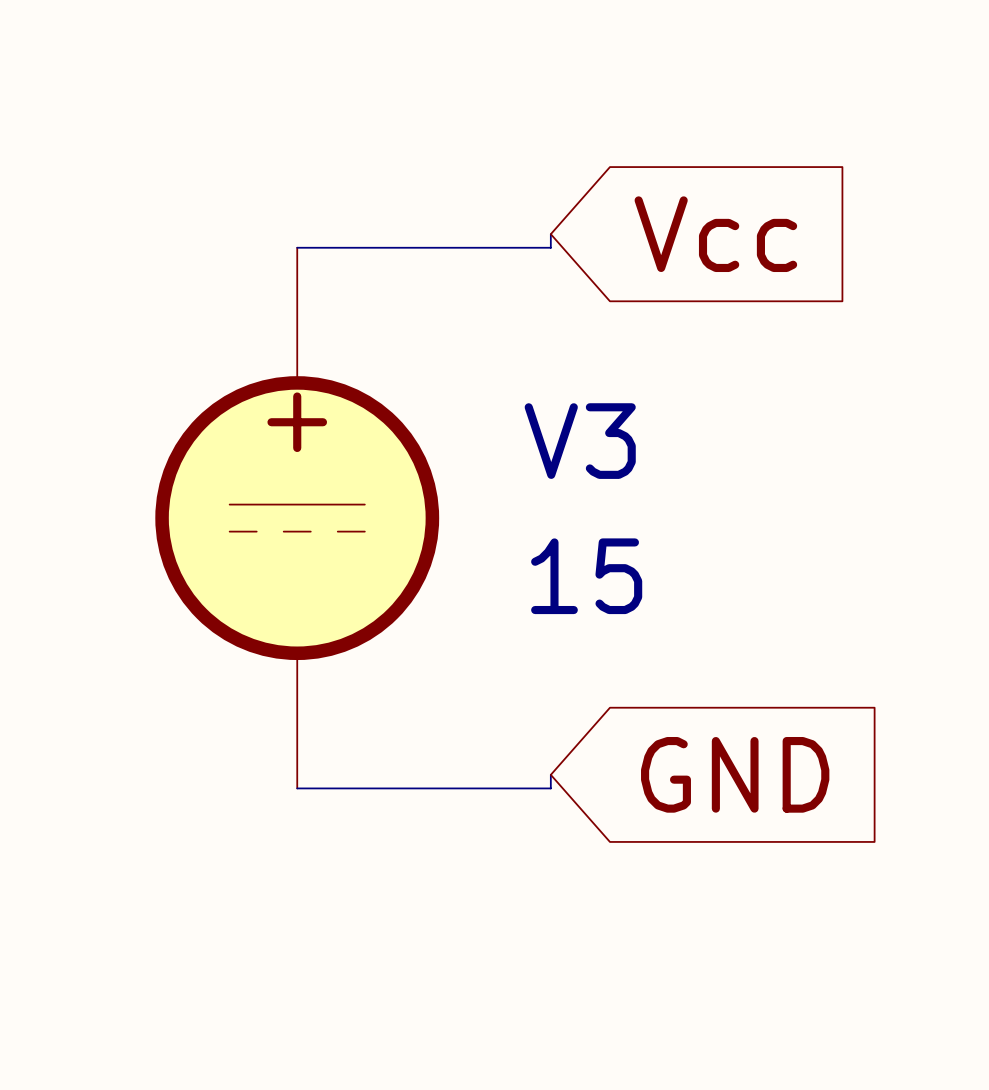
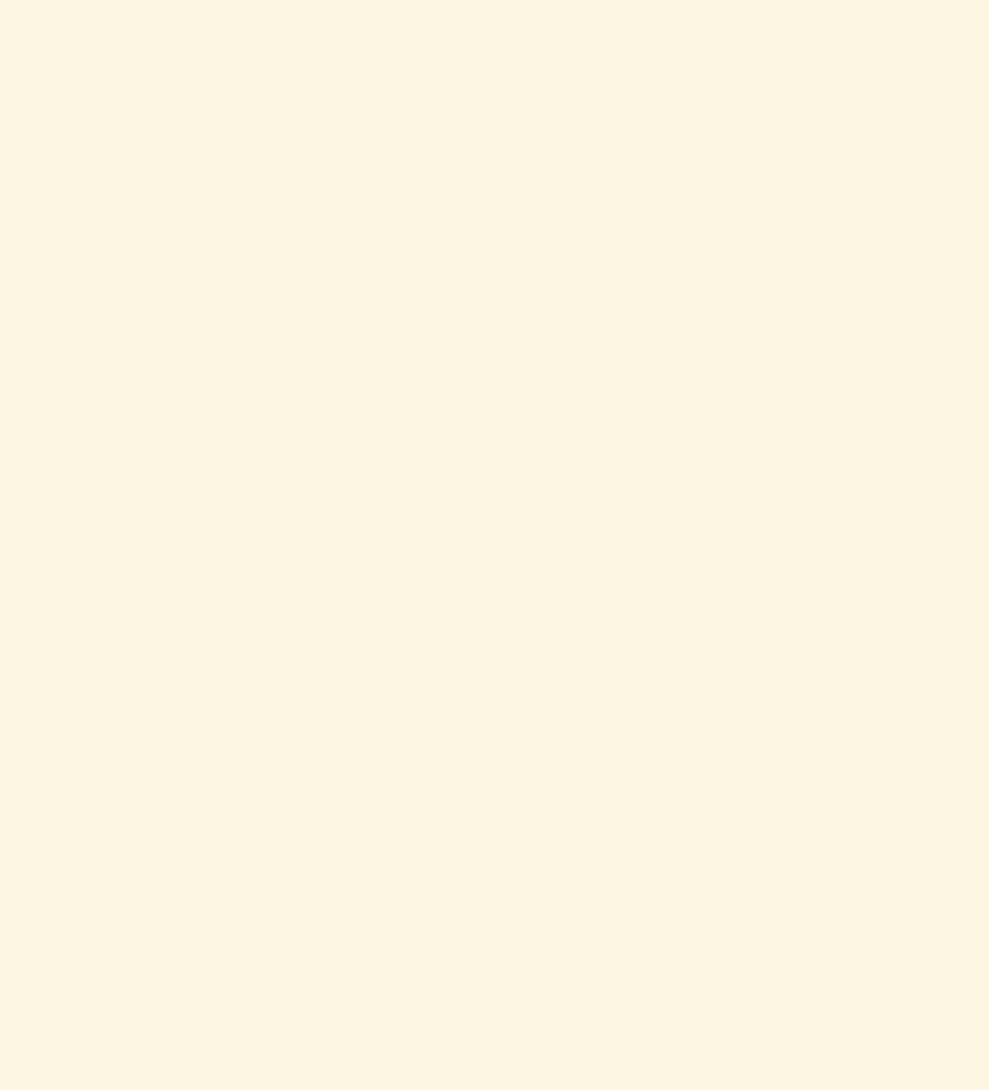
wire: (550, 234) (550, 247) (297, 247) -> none
global label: Vcc (715, 234) -> none
V3: 15 (297, 518) -> none
wire: (550, 774) (550, 788) (297, 788) -> none
global label: GND (735, 774) -> none

